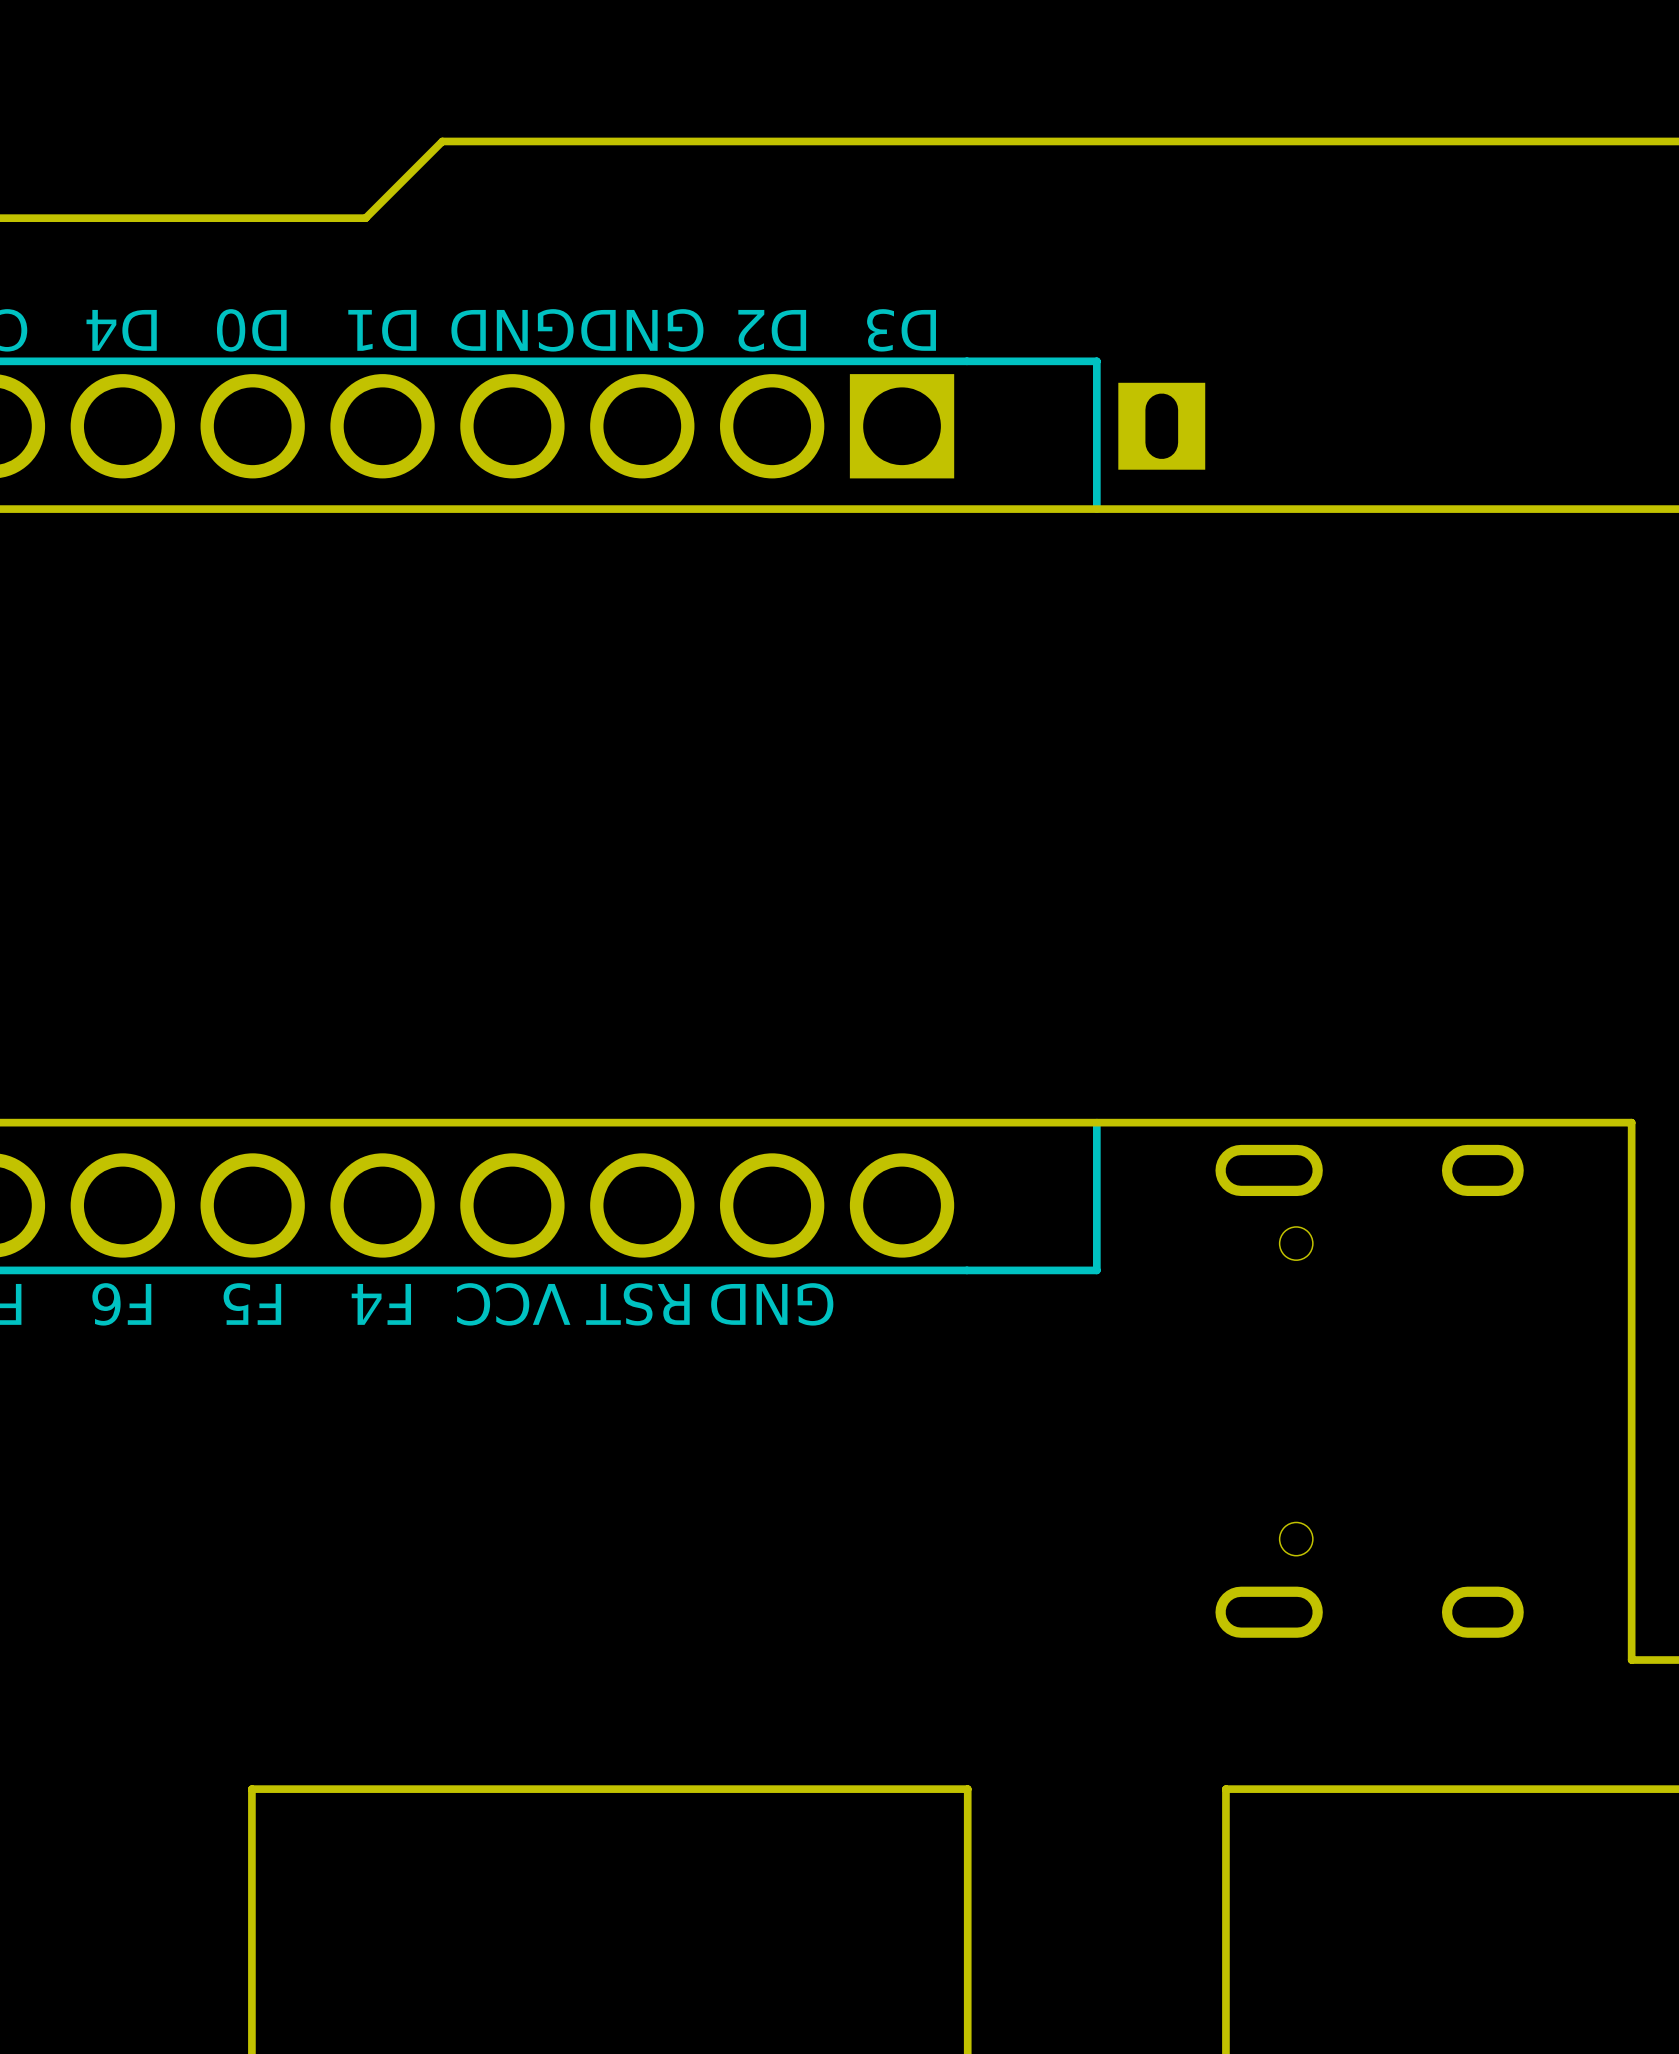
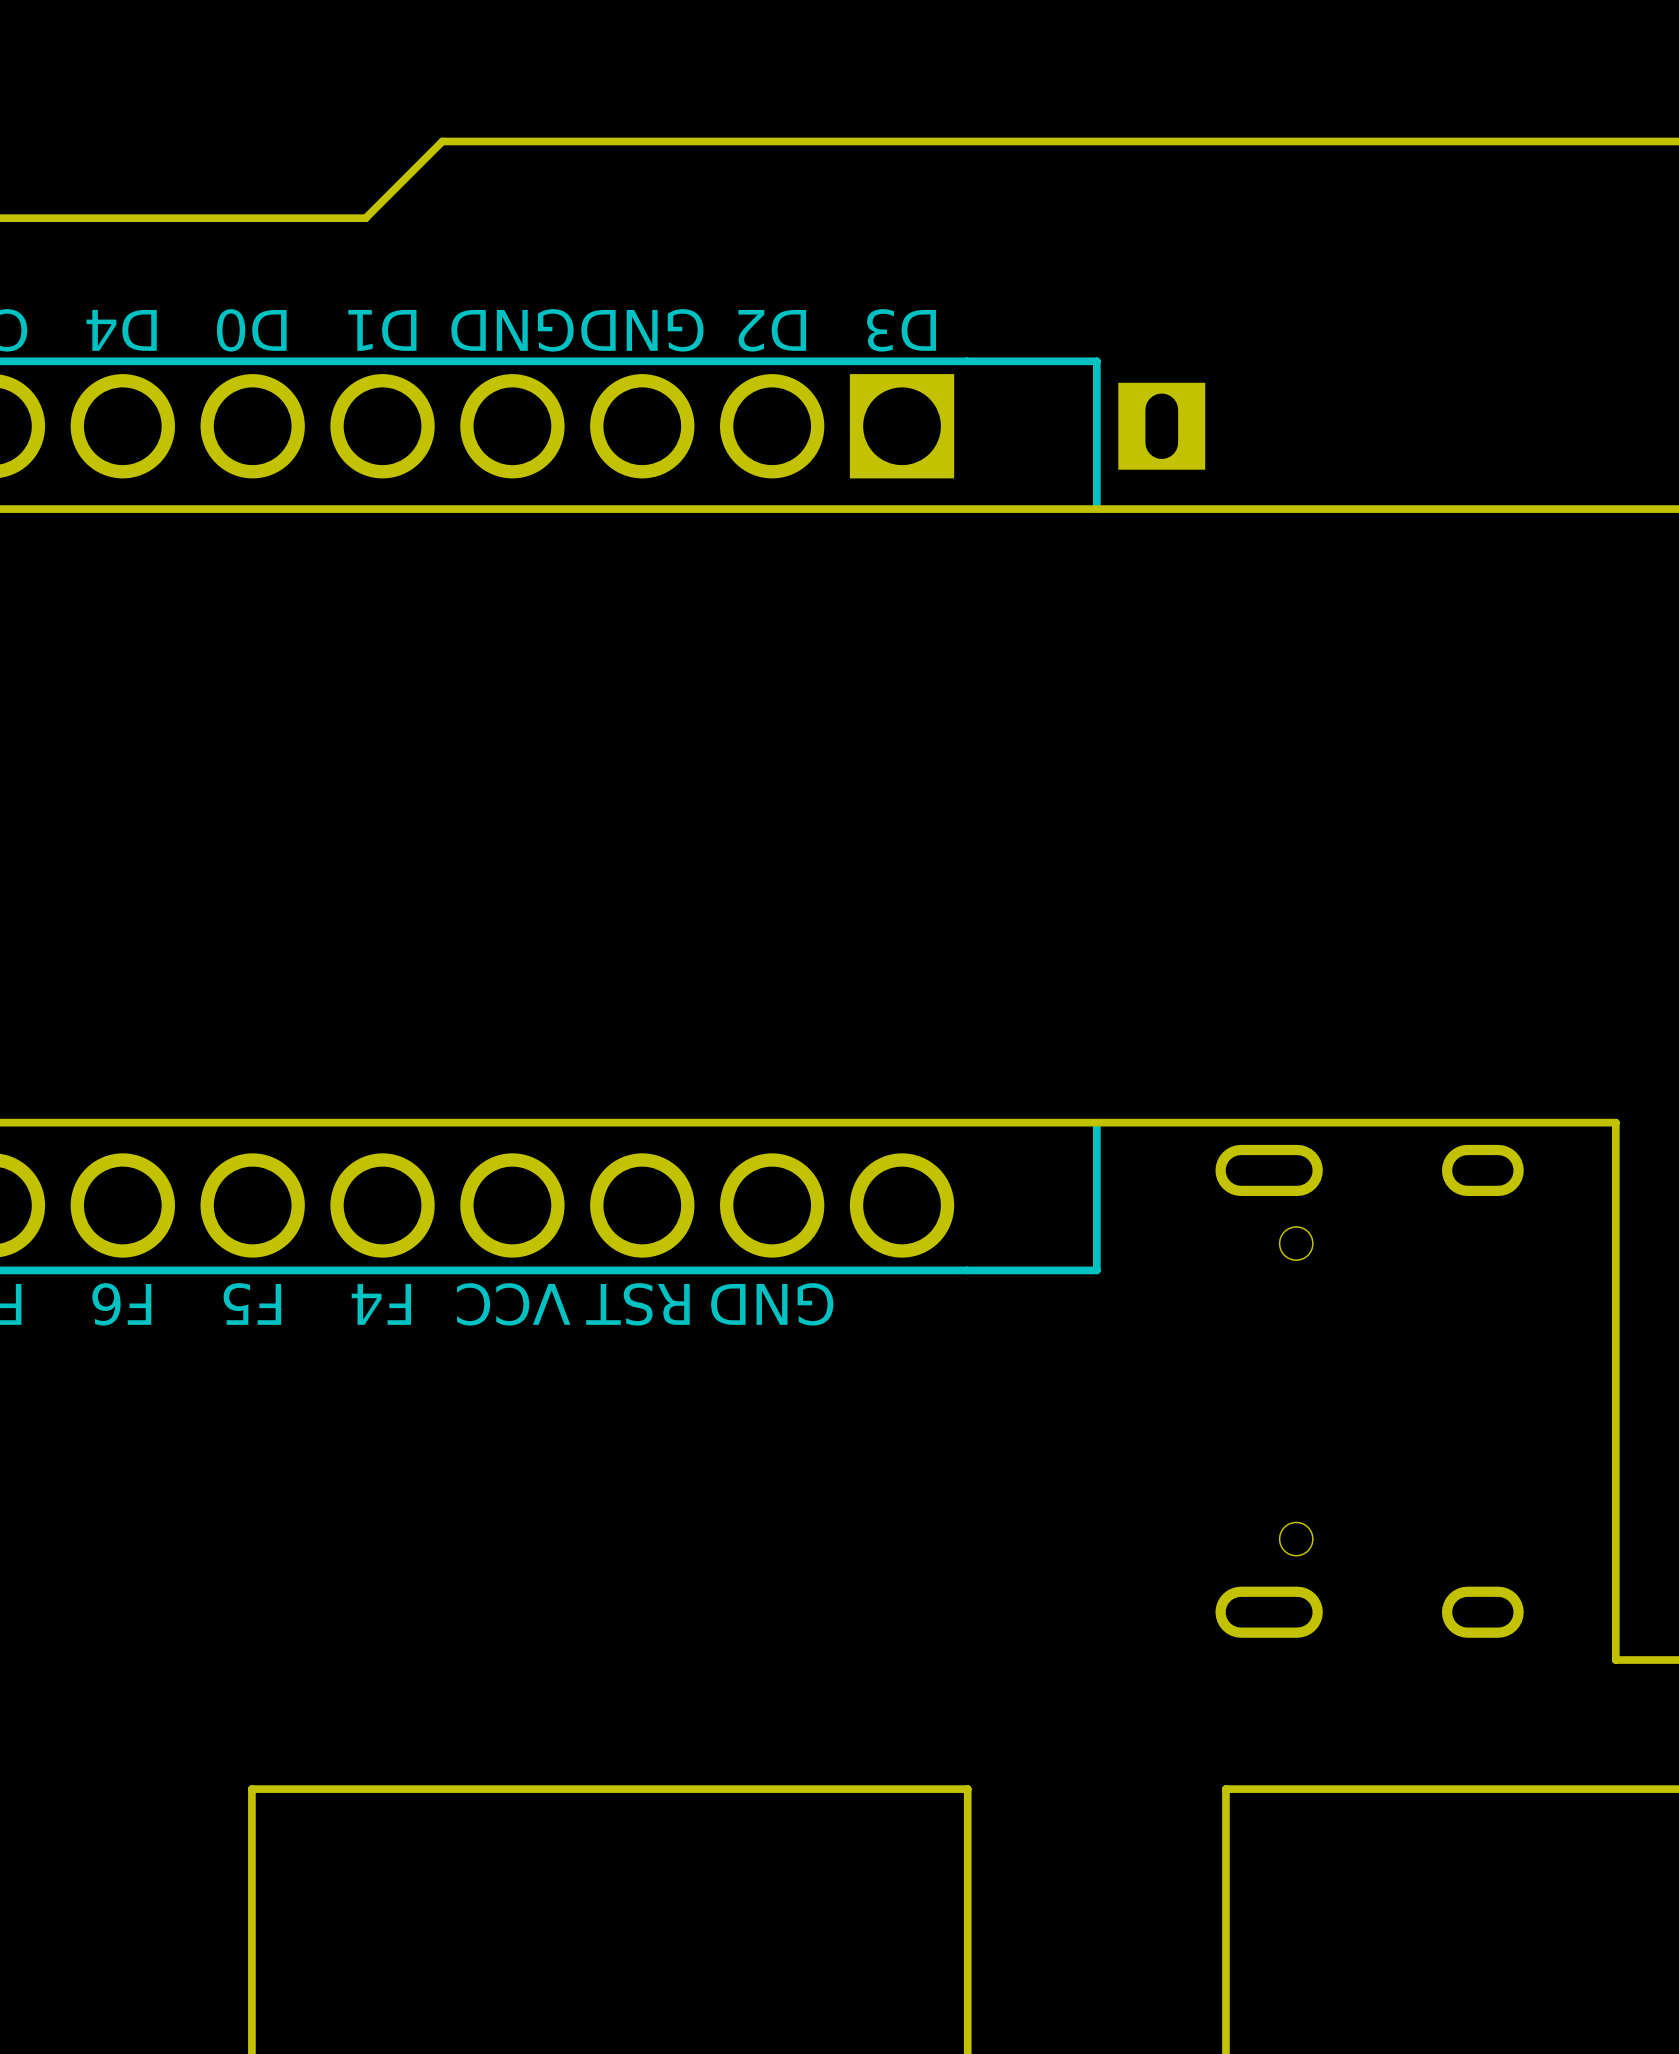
board edge: (1615, 1122) (1631, 1122) (1631, 1660) -> (1615, 1122) (1615, 1660) (1631, 1660)

